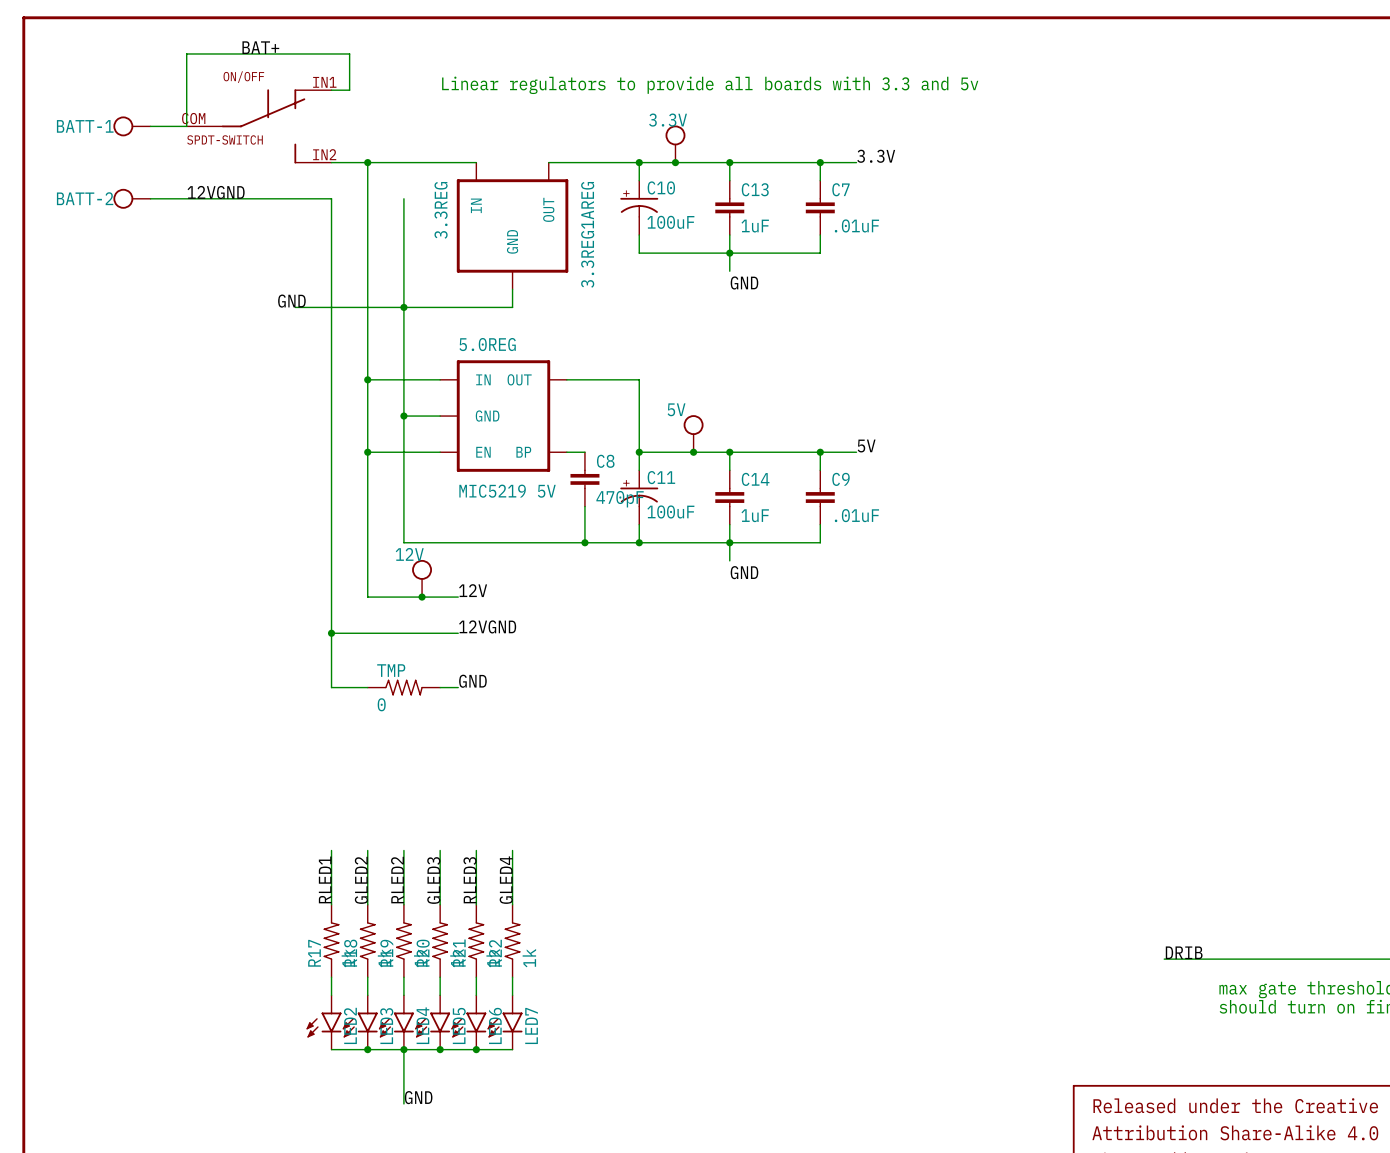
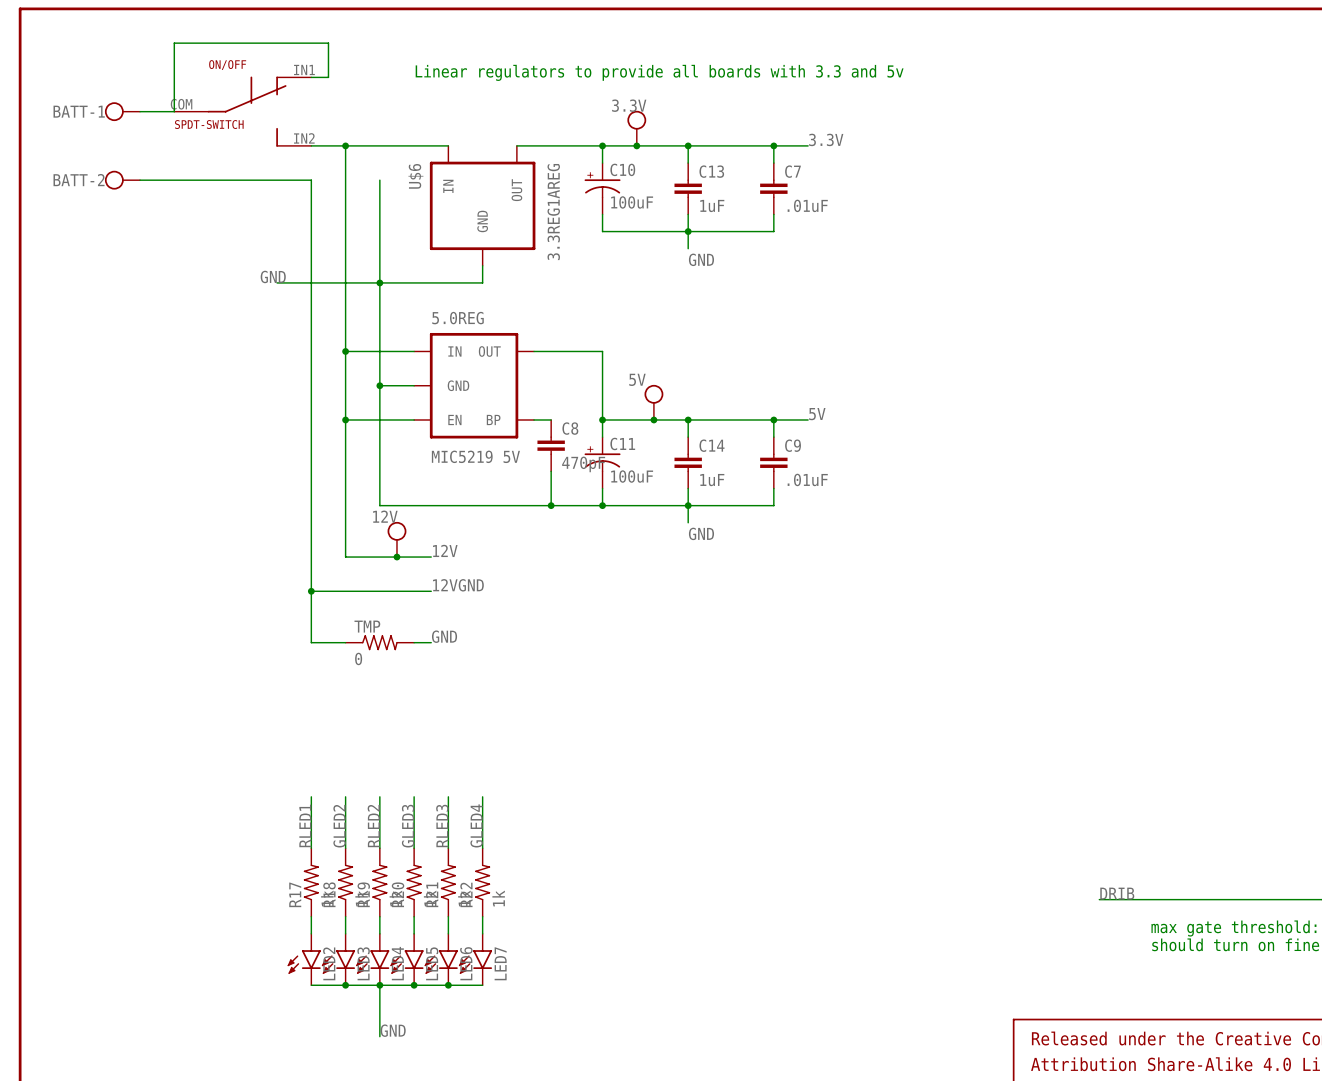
label: BAT+ (260, 47) -> none
label: 12VGND (216, 192) -> none
3.3REG name: 3.3REG (441, 210) -> U$6 (415, 176)

